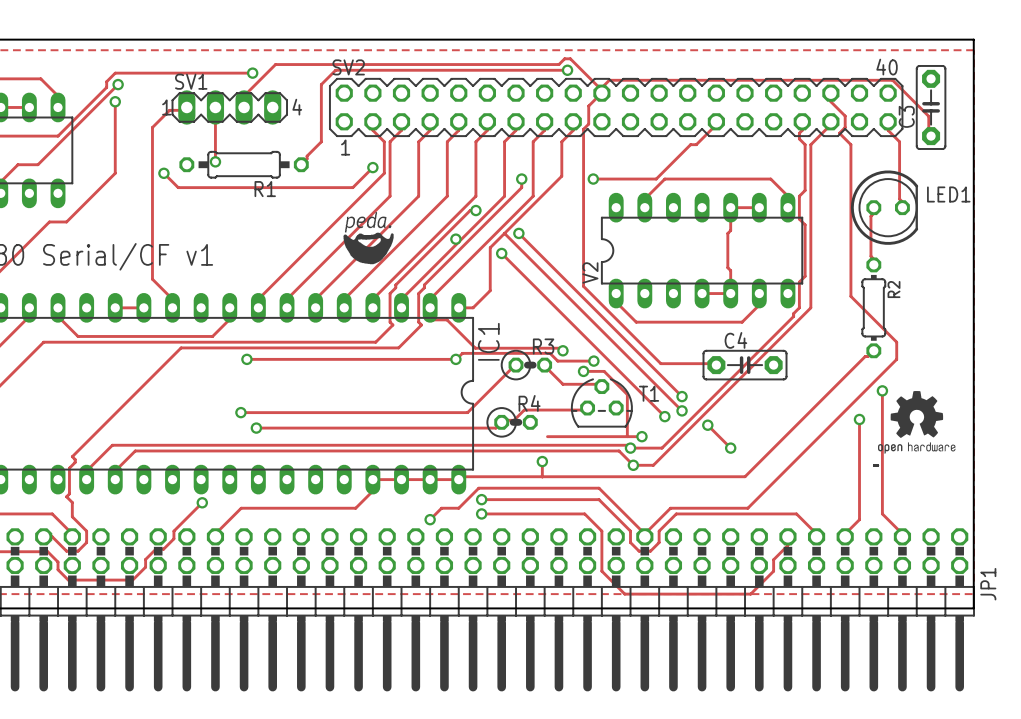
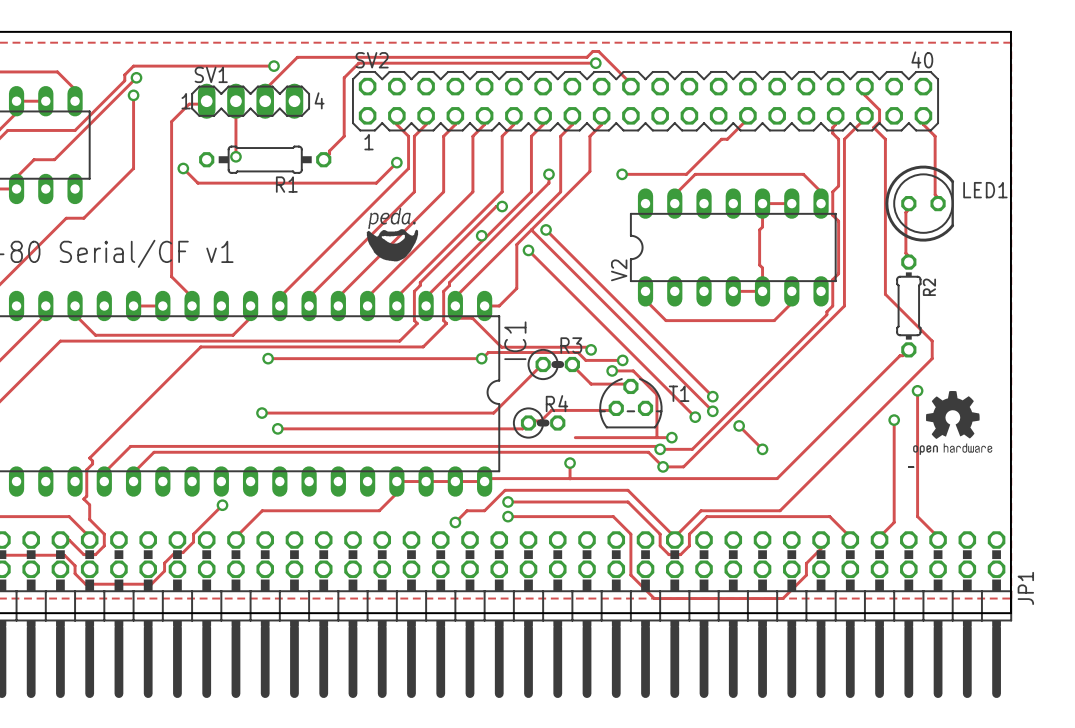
C3: (931, 107) -> none
track: (931, 136) (928, 134) (928, 116) (892, 80) (609, 80) (601, 88) (601, 93) (588, 106) (588, 124) (583, 129) (583, 286) (660, 363) (716, 365) -> none
C4: (745, 365) -> none

